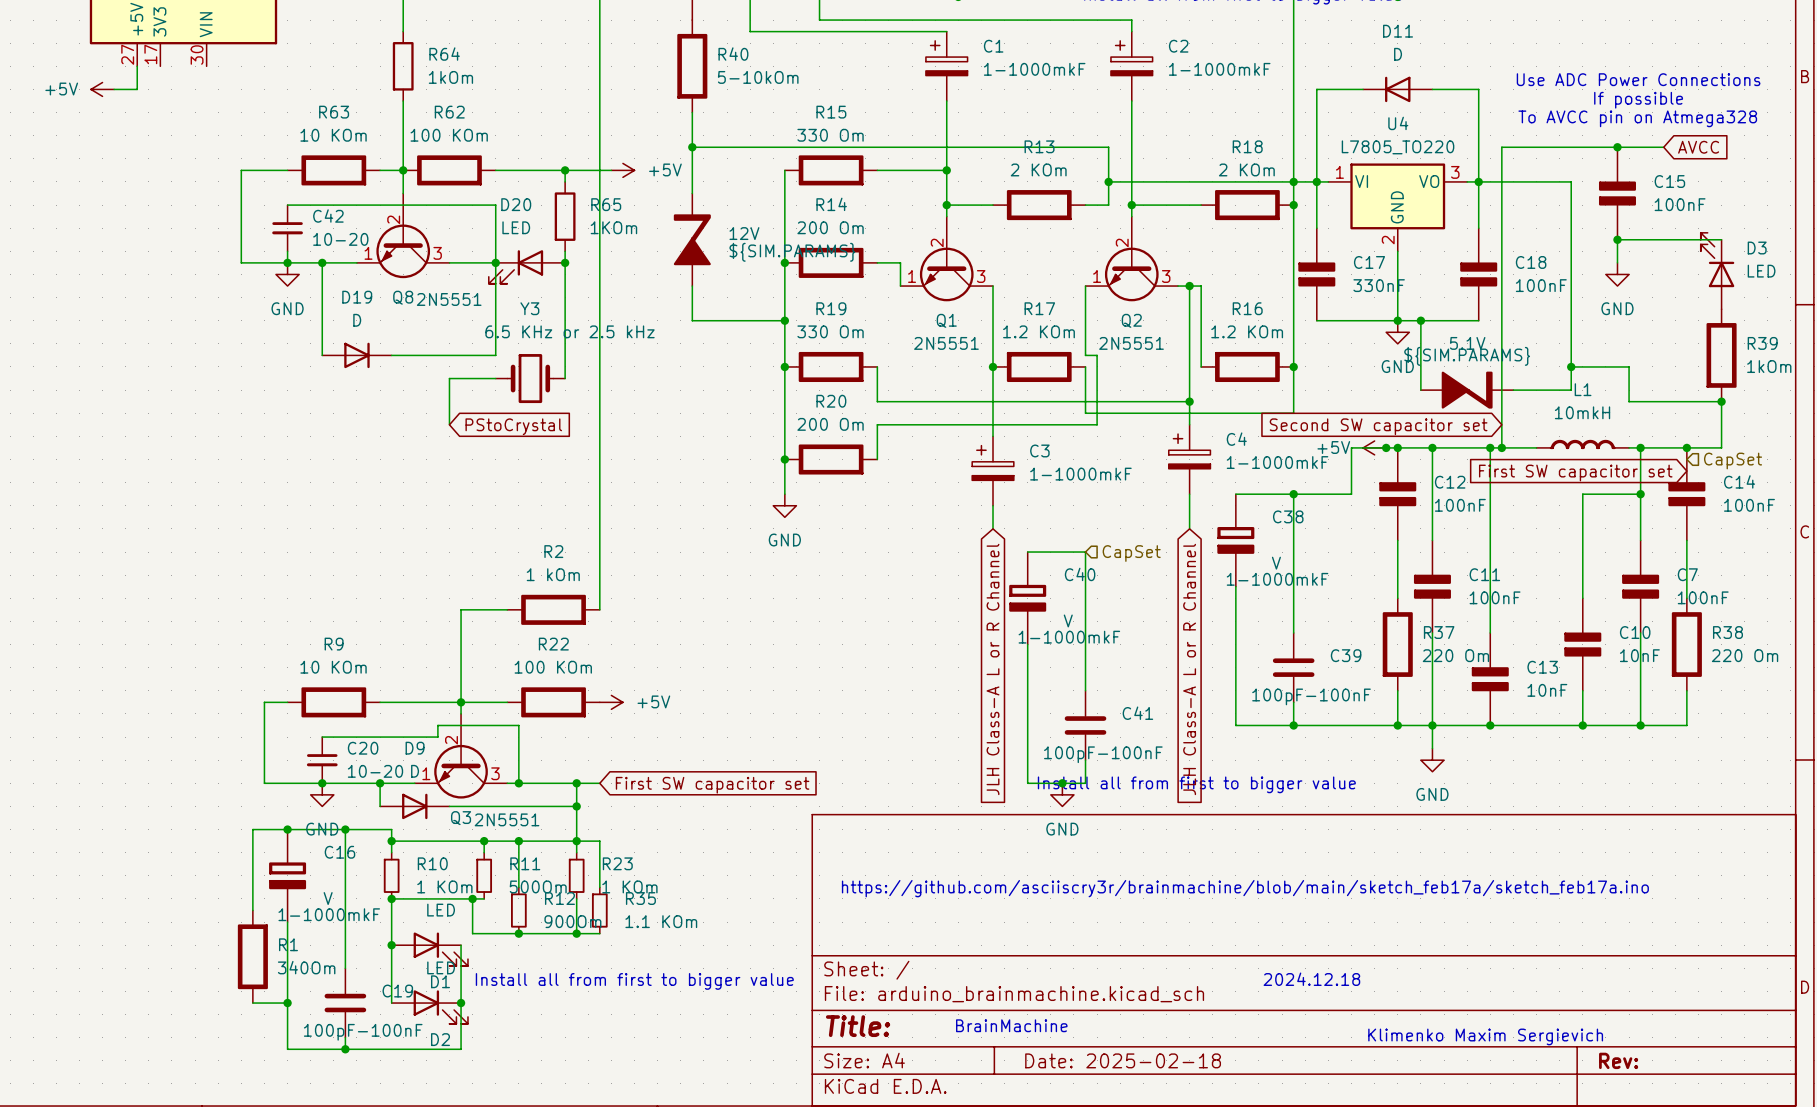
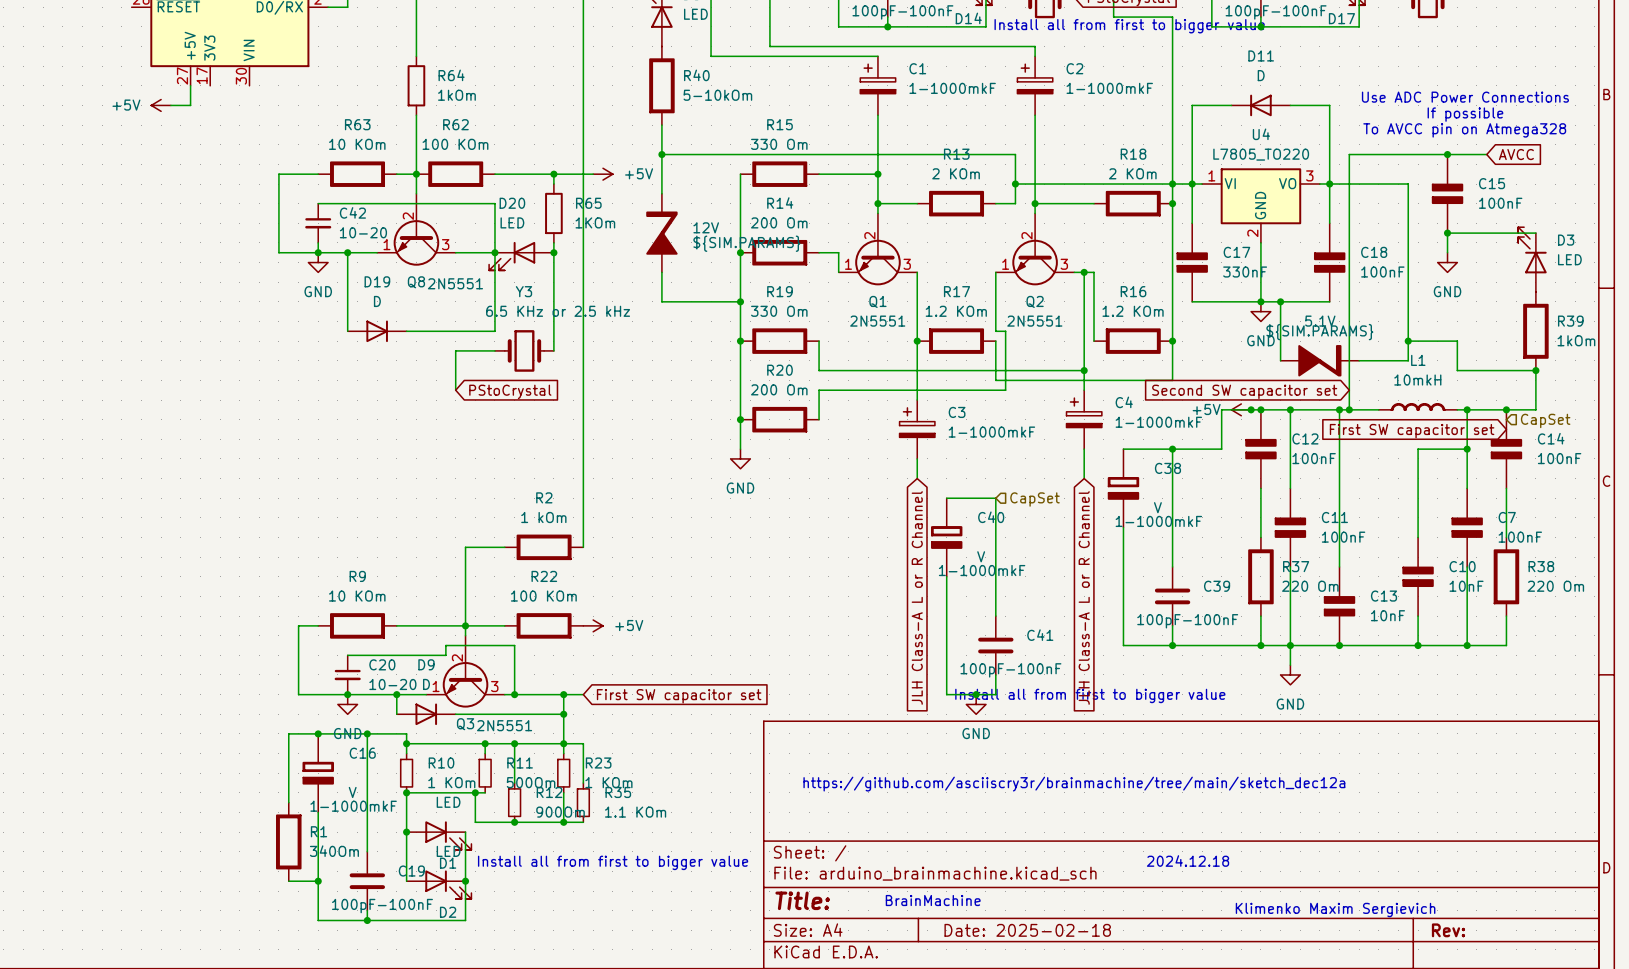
text: https://github.com/asciiscry3r/brainmachine/blob/main/sketch_feb17a/sketch_feb17a.ino (1245, 888) -> https://github.com/asciiscry3r/brainmachine/tree/main/sketch_dec12a (1074, 784)

